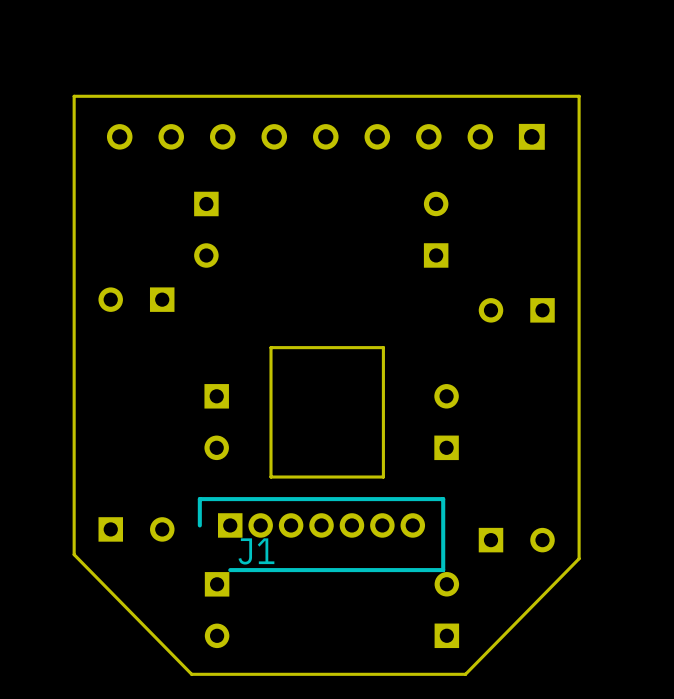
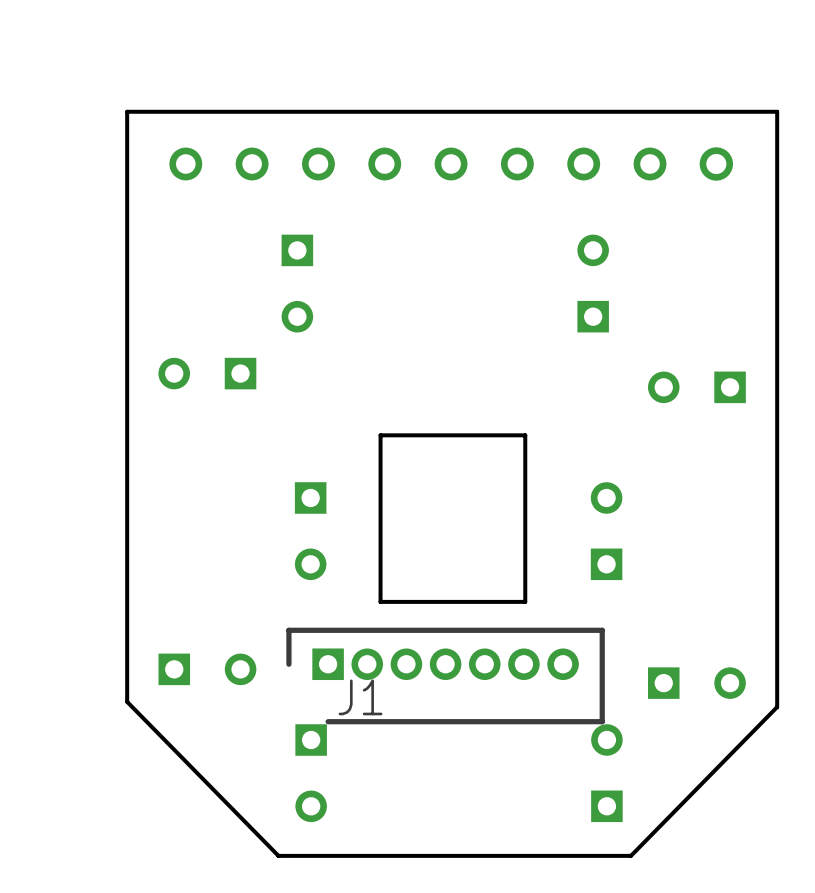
part footprint: [106, 123, 545, 150] -> [169, 147, 734, 181]

